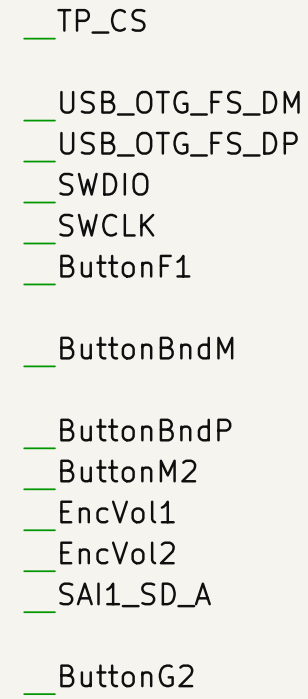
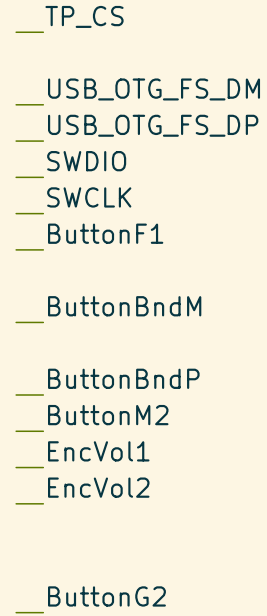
label: SAI1_SD_A (135, 594) -> none
wire: (24, 612) (54, 612) -> none

